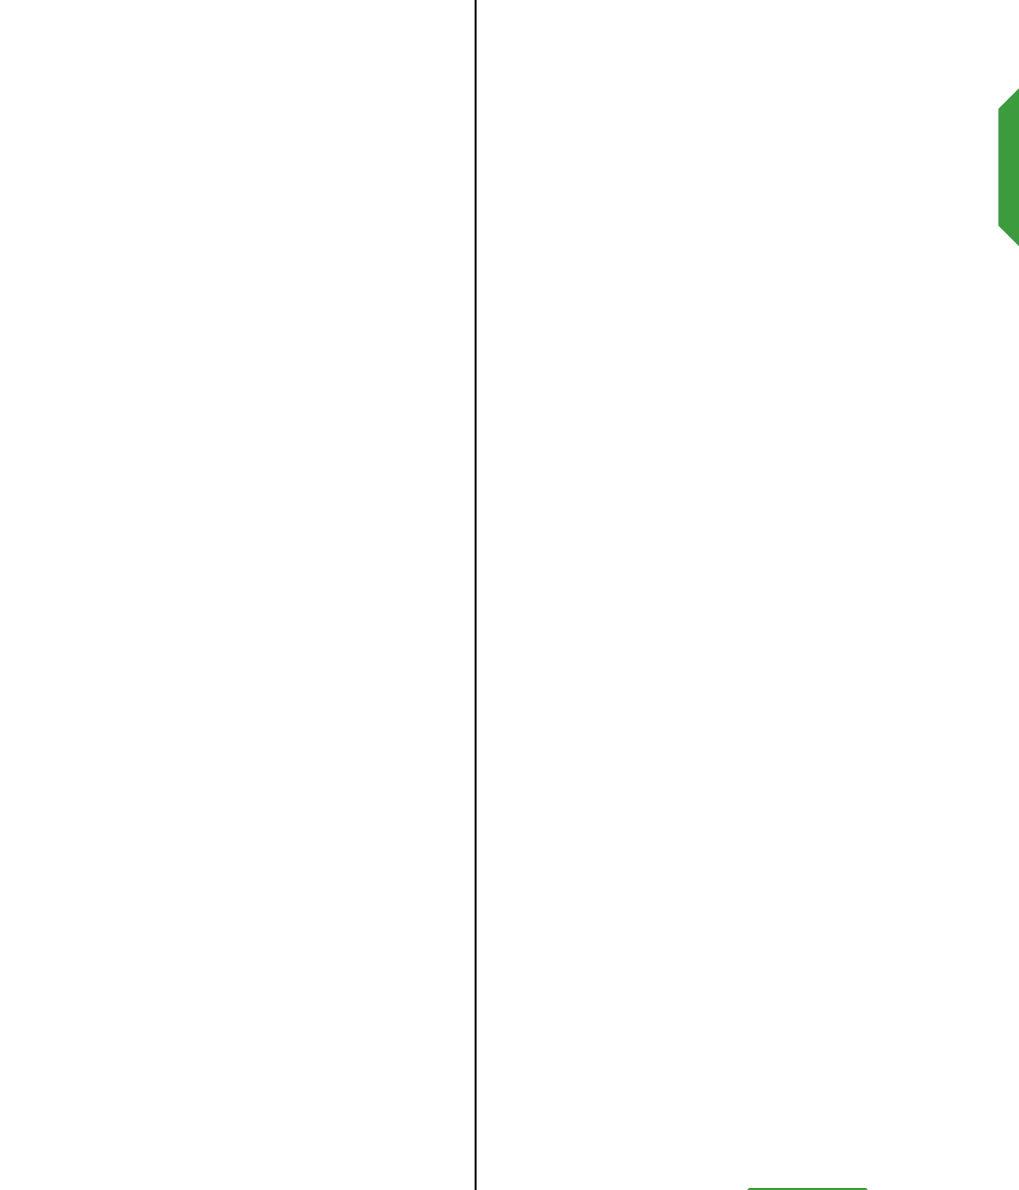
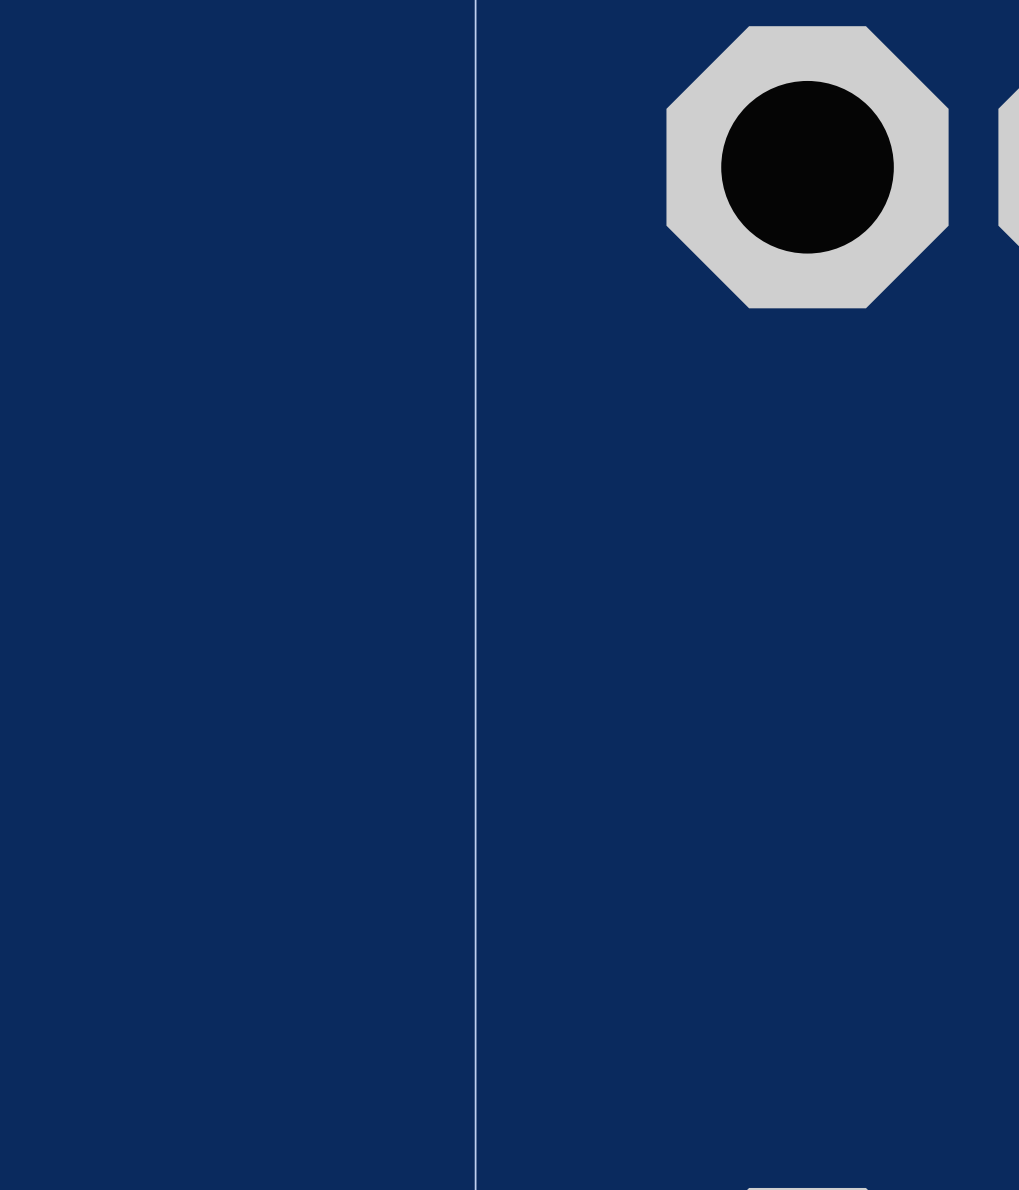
part: none -> (807, 167)

